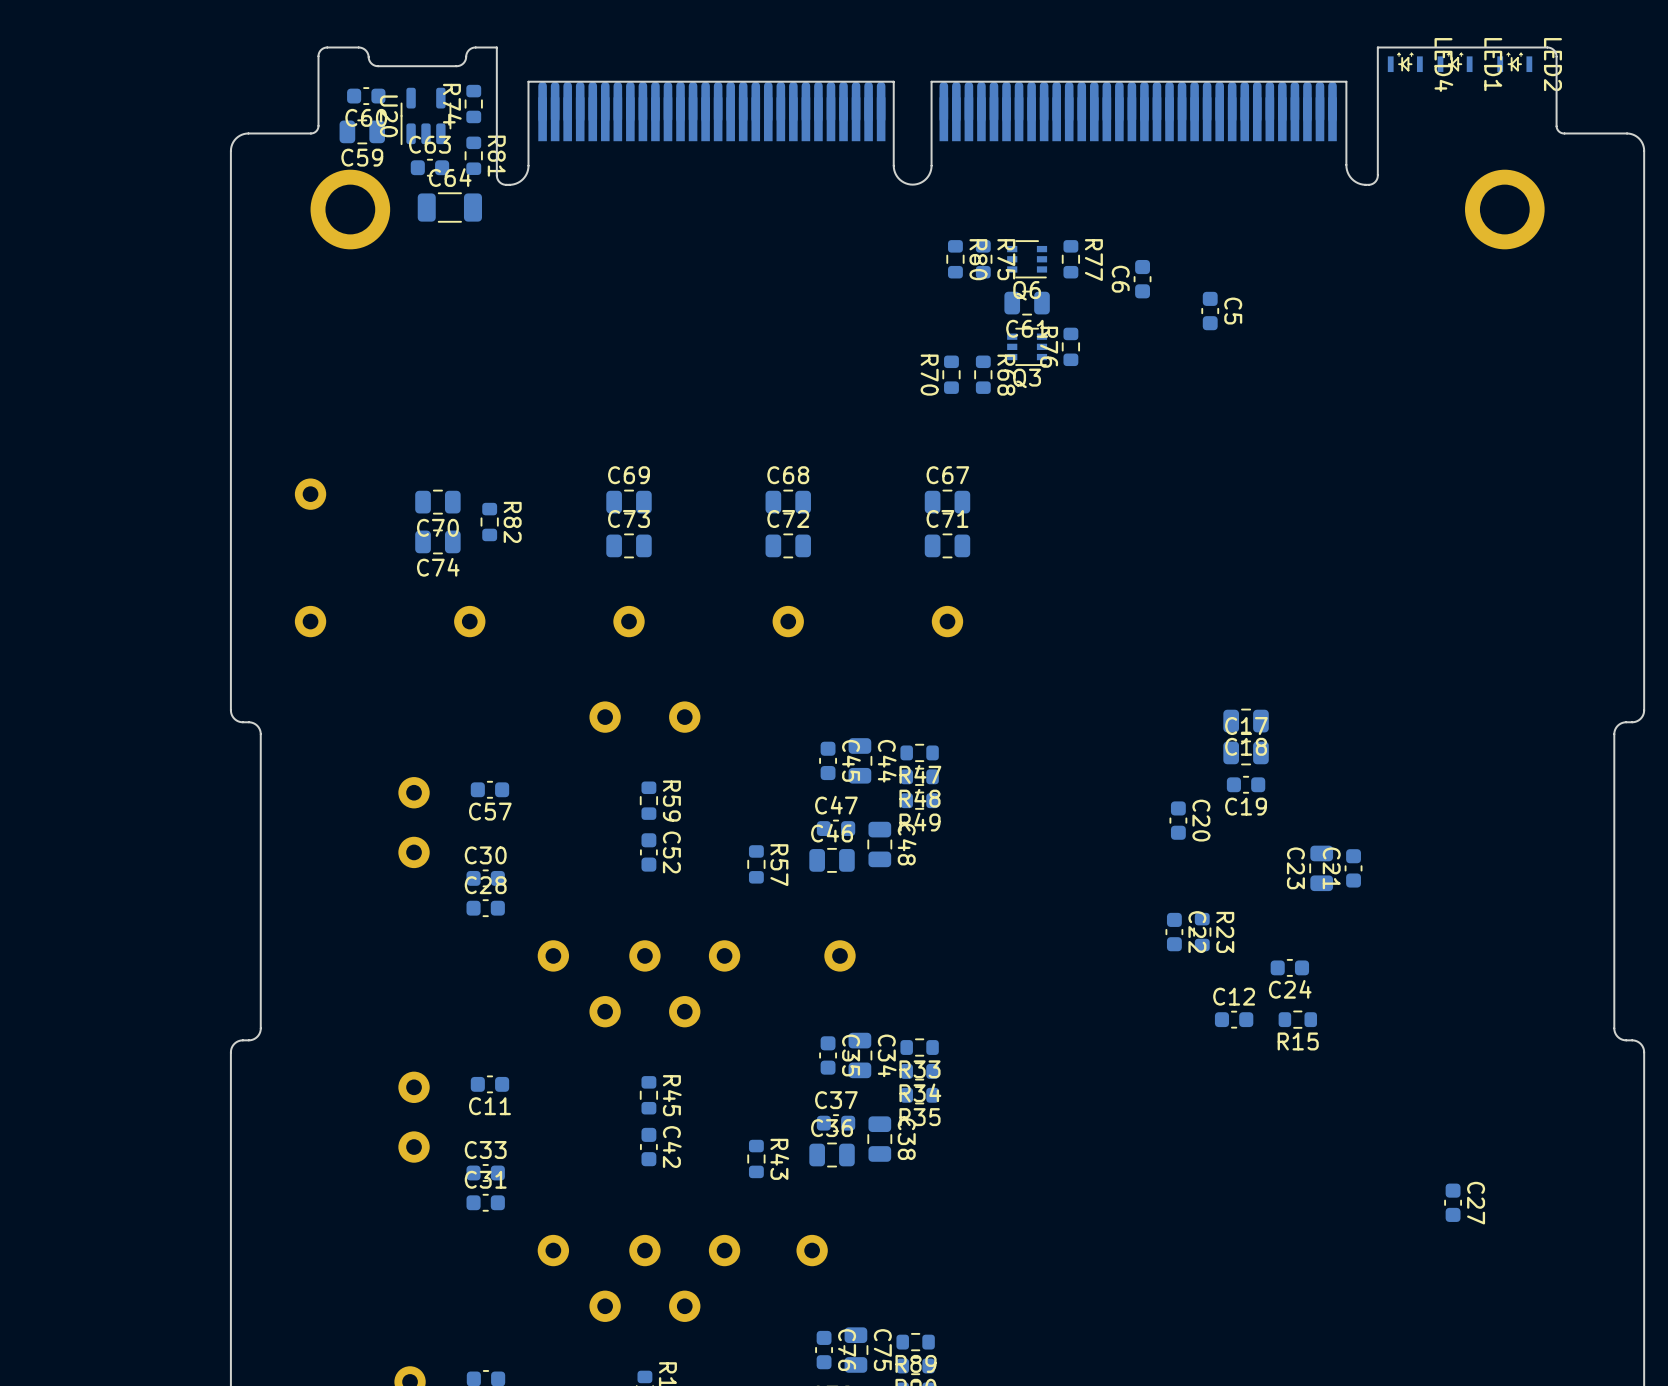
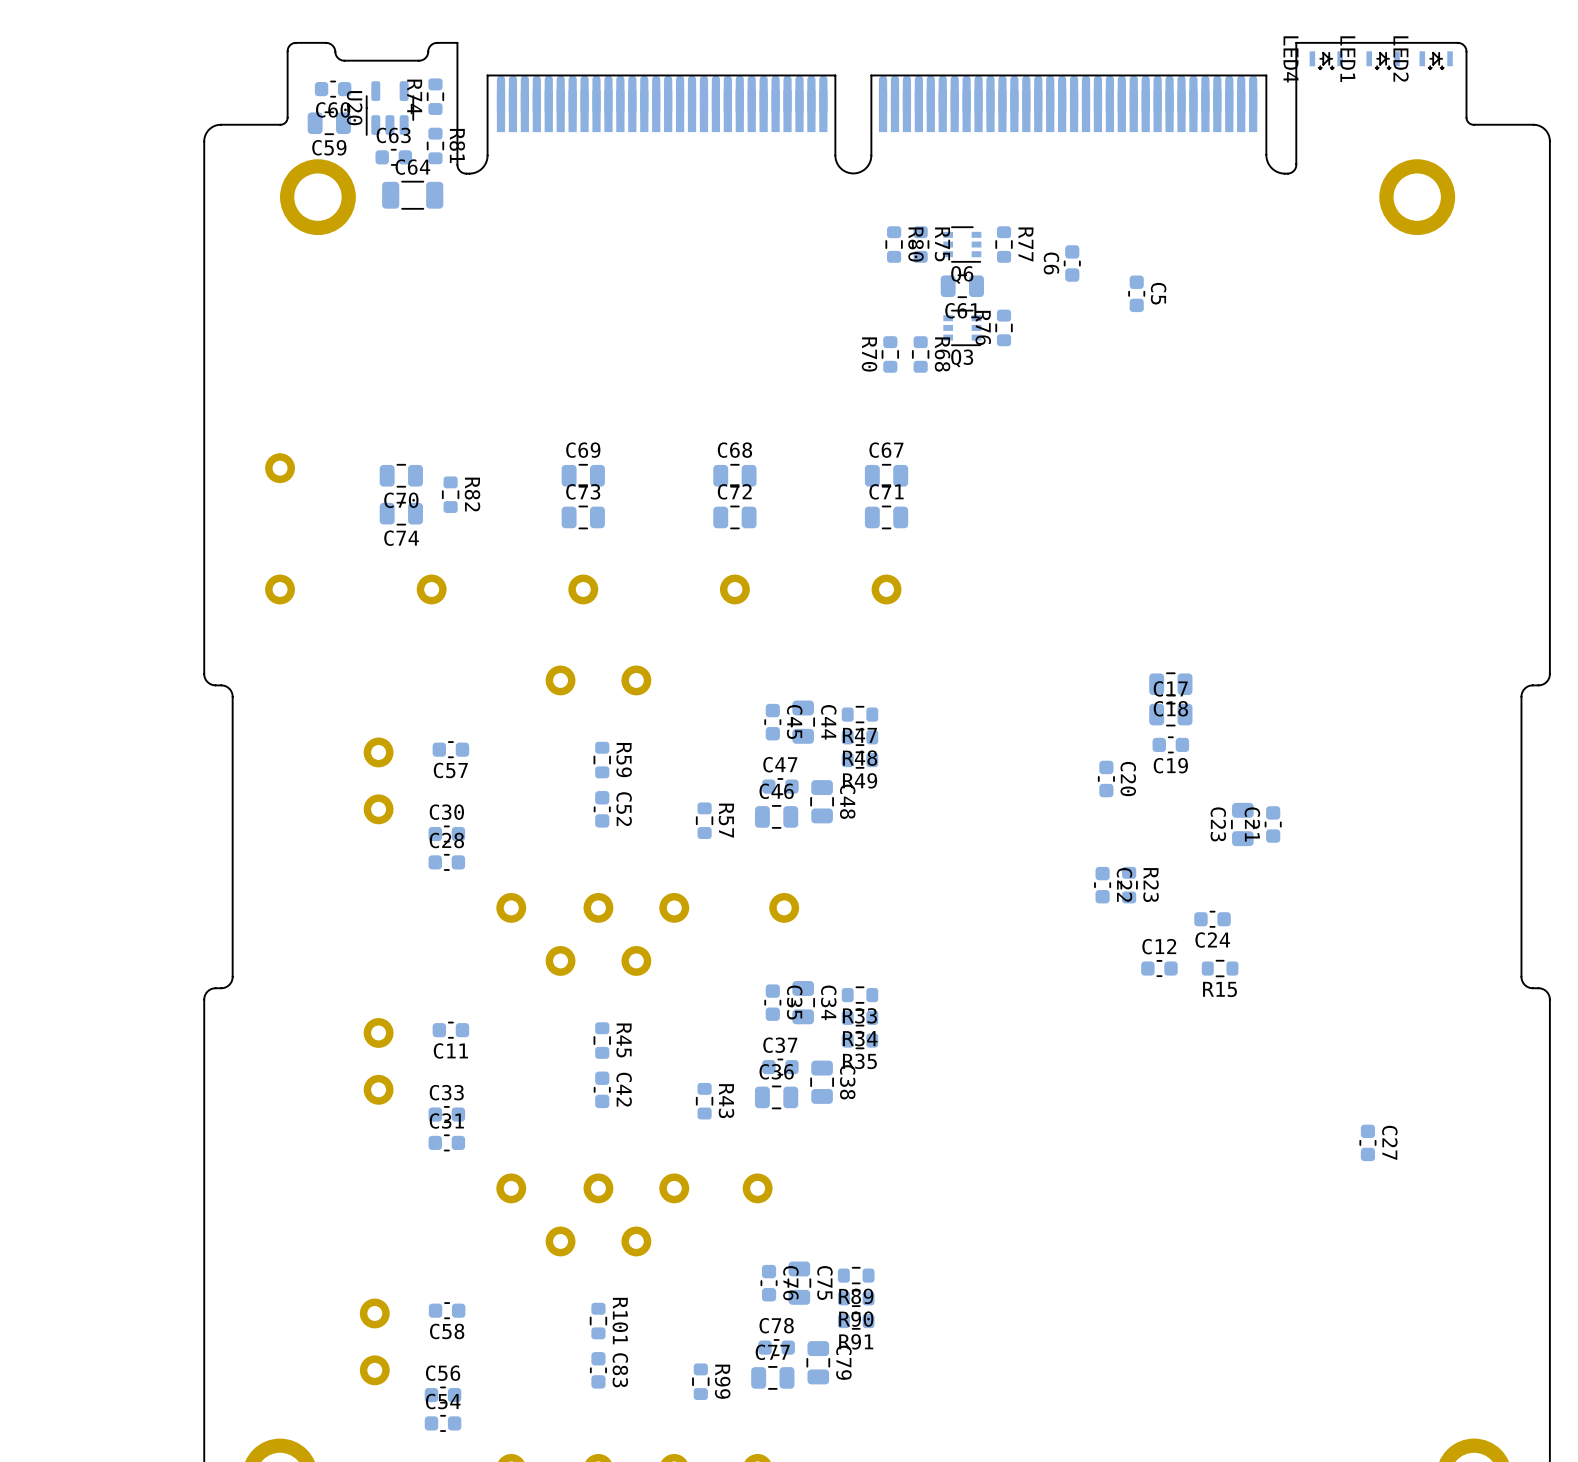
LED4 rotation: 0° (1405, 62) -> 180° (1326, 60)
LED1 rotation: 0° (1455, 62) -> 180° (1383, 60)
LED2 rotation: 0° (1514, 62) -> 180° (1436, 60)

